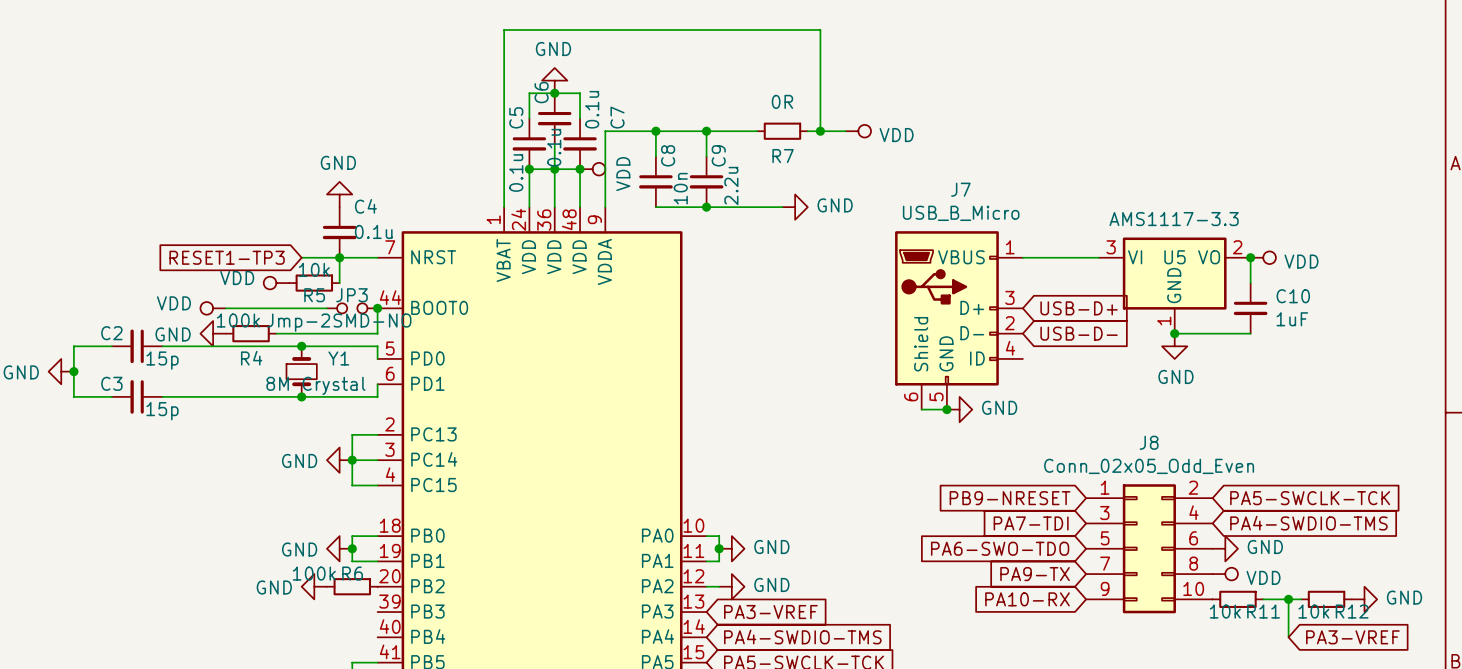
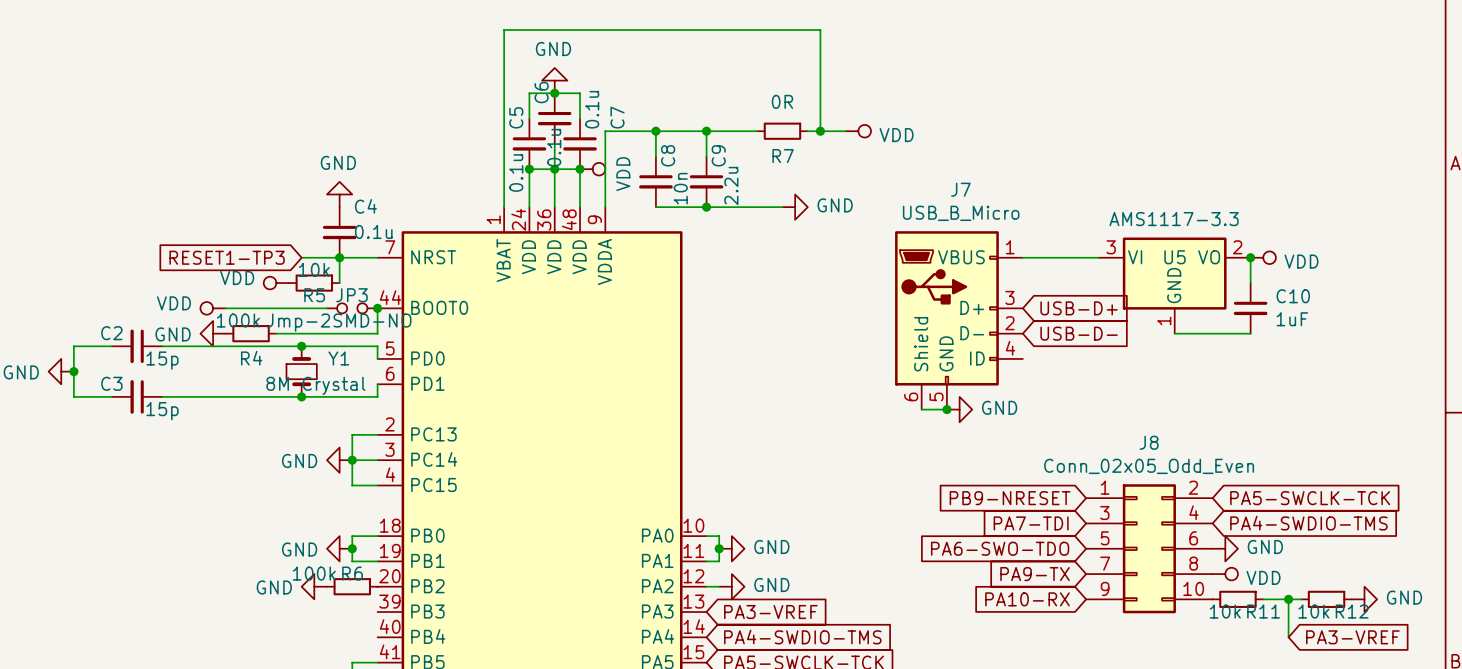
junction: (1174, 333) -> none
power symbol: GND (1174, 346) -> none

